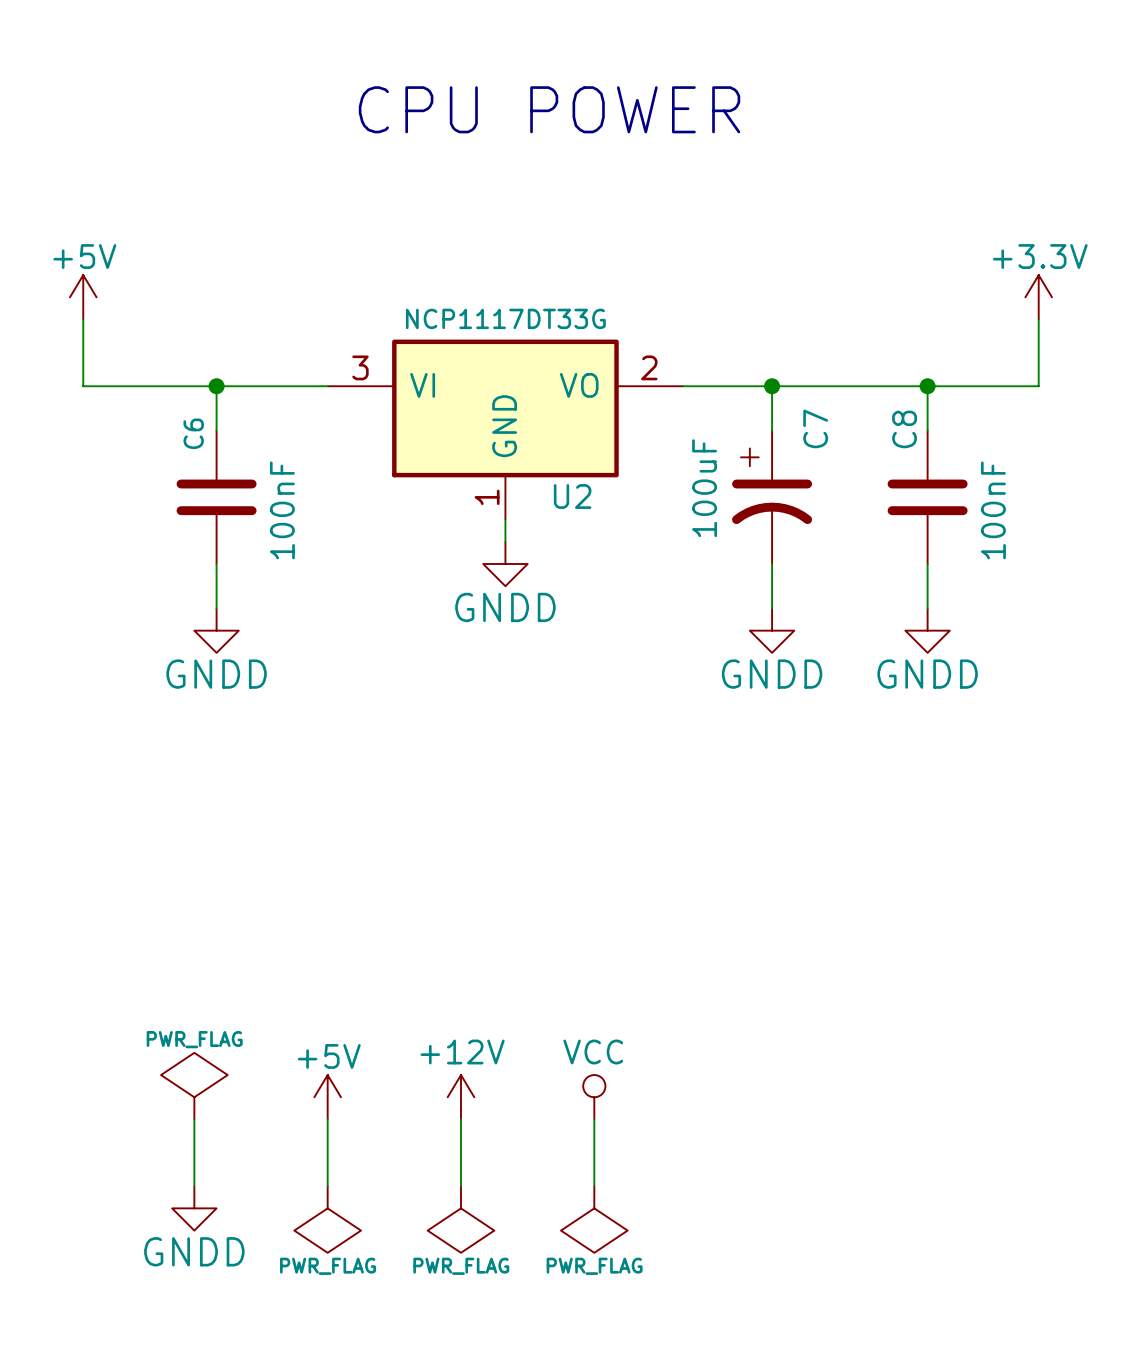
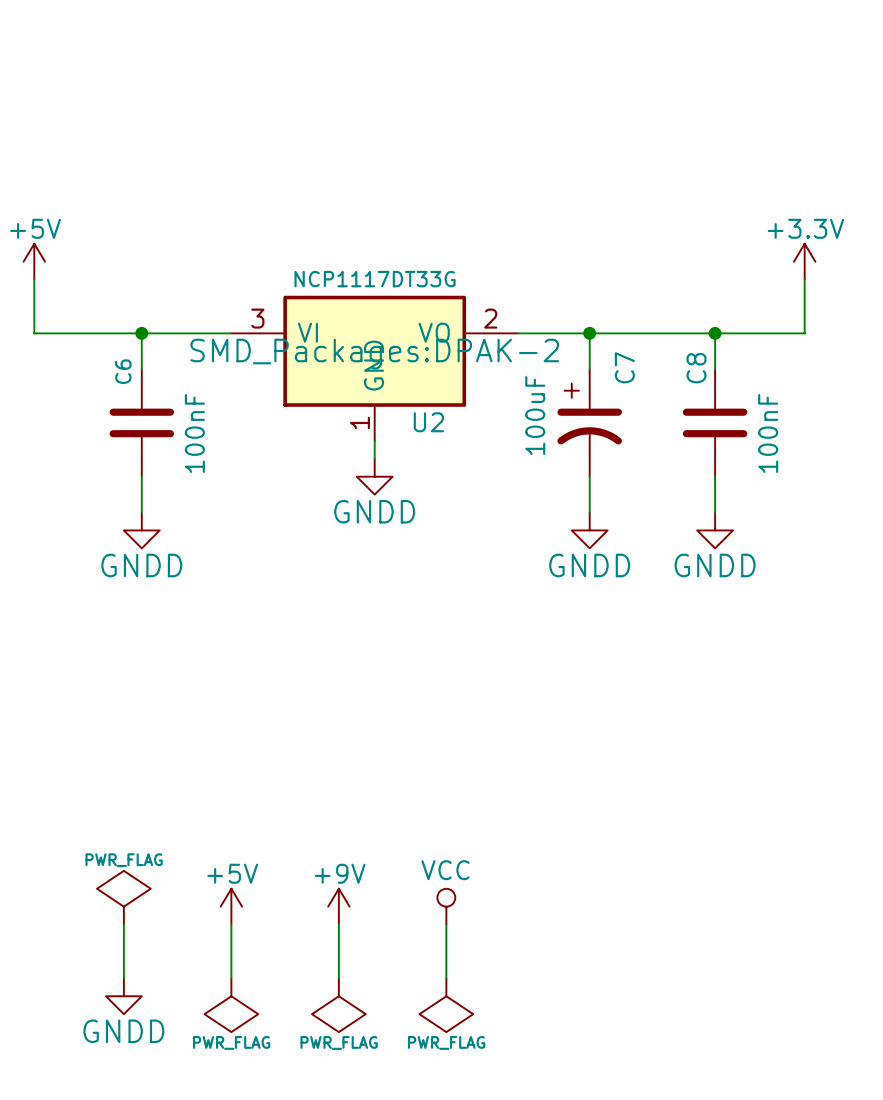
text: CPU POWER (549, 109) -> none
U2 text: none -> SMD_Packages:DPAK-2 (374, 354)
power symbol: +12V (460, 1097) -> +9V (338, 906)

